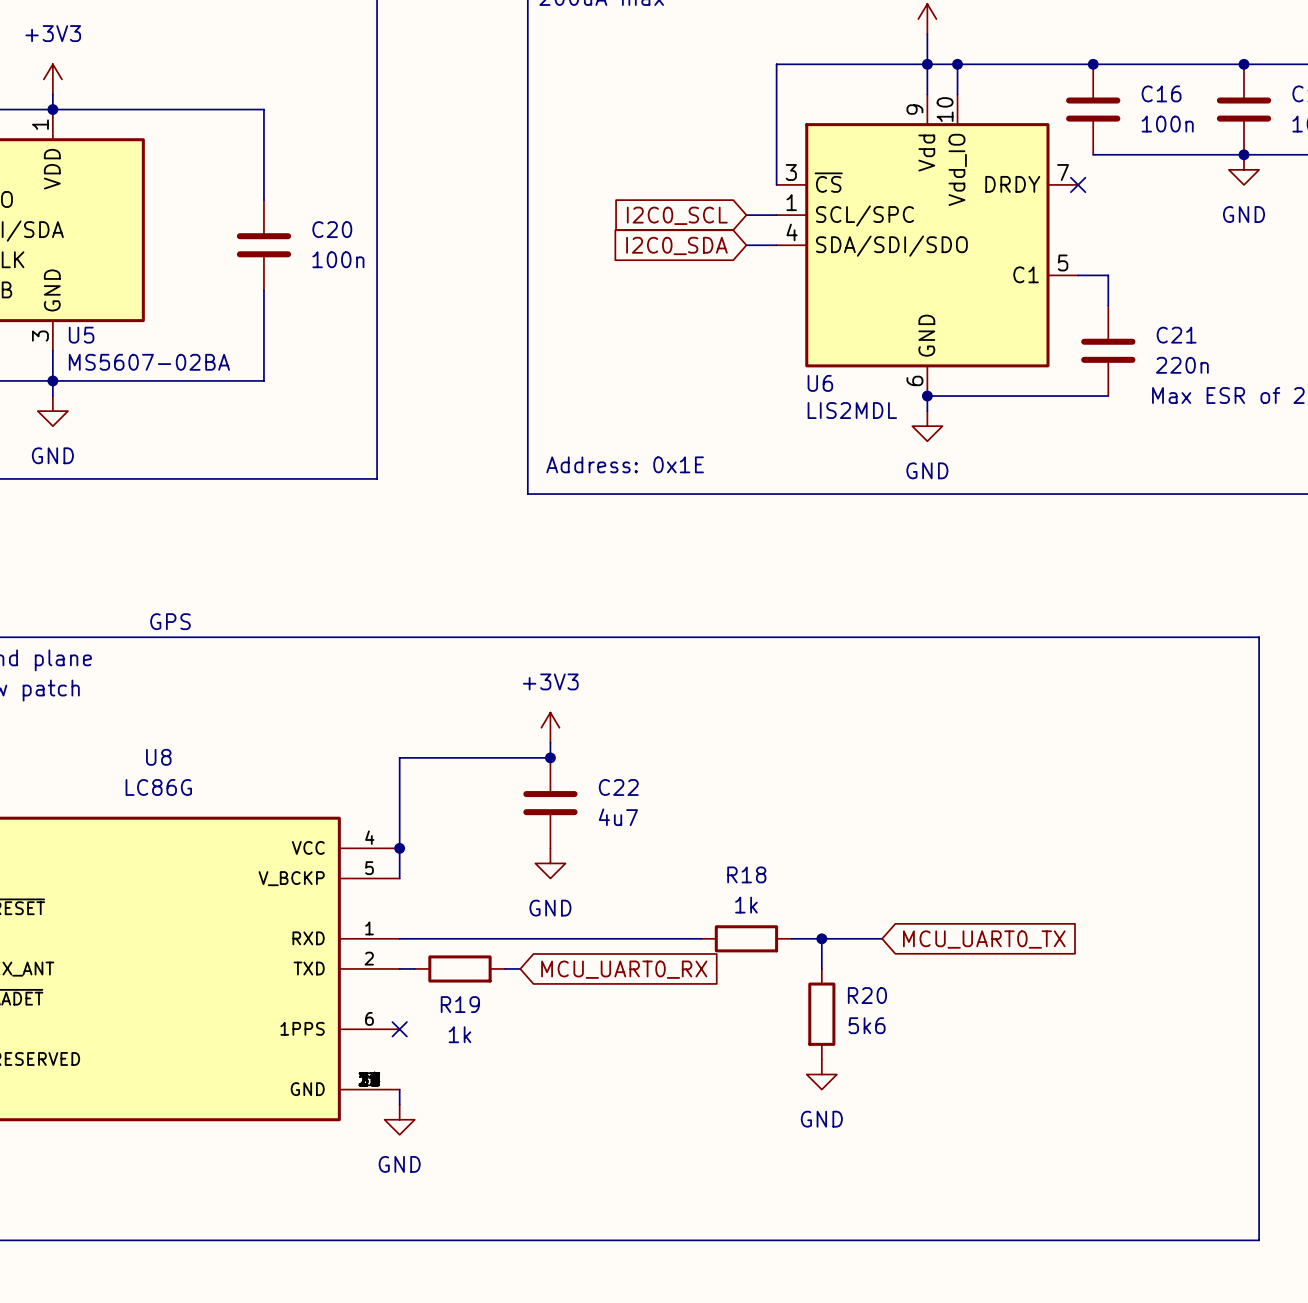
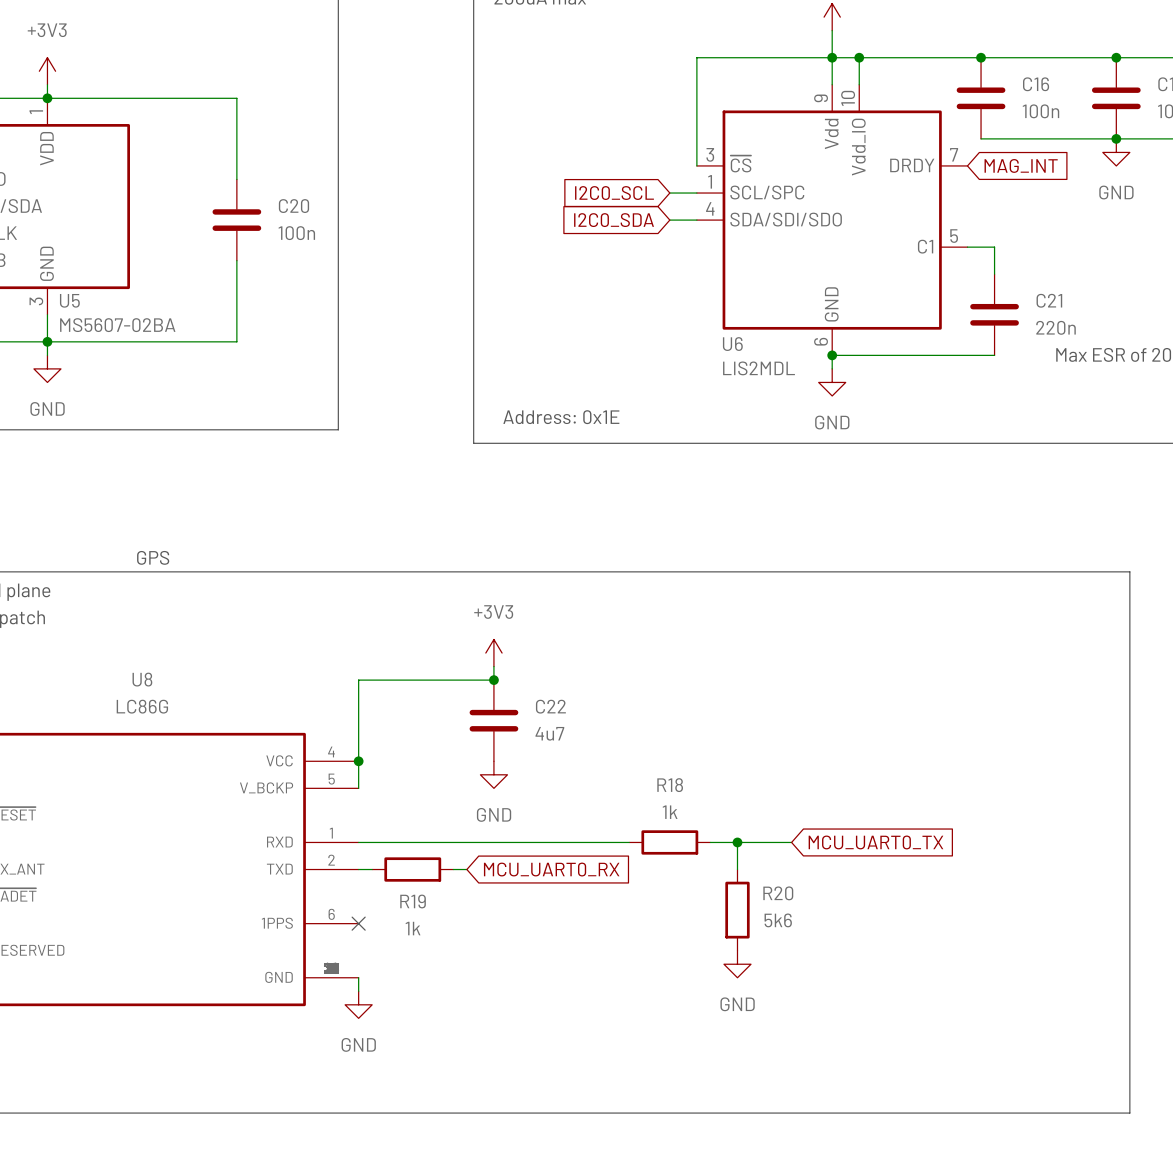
no-connect mark: (1078, 184) -> none
global label: none -> MAG_INT (1021, 165)

